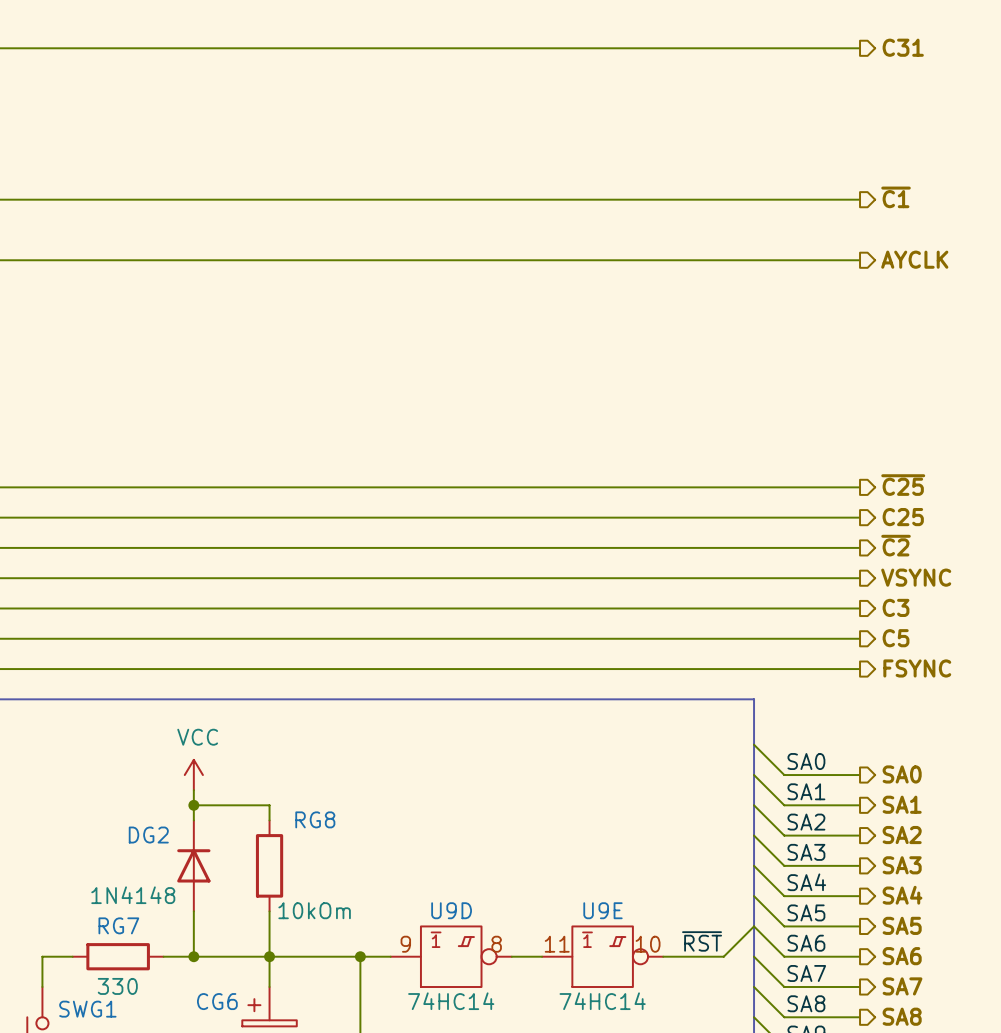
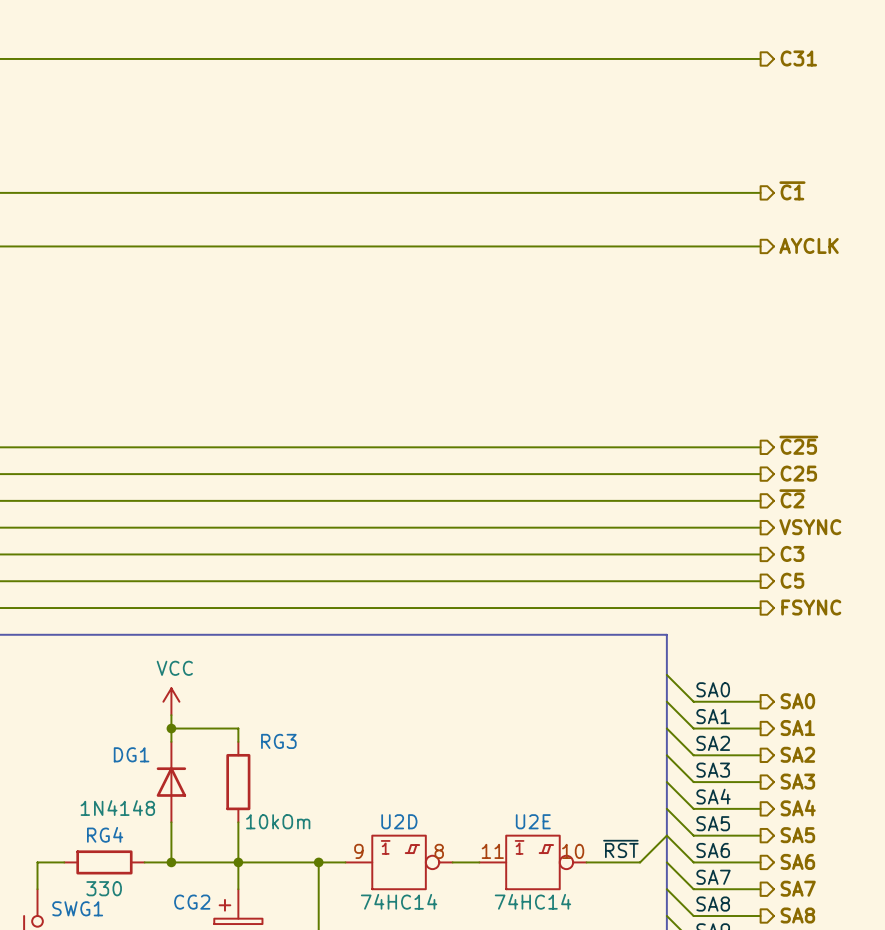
RG8 name: RG8 (315, 819) -> RG3 (278, 741)
DG2 name: DG2 (148, 835) -> DG1 (131, 754)
U9D name: U9D (451, 910) -> U2D (399, 821)
U9E name: U9E (602, 910) -> U2E (533, 821)
RG7 name: RG7 (118, 925) -> RG4 (105, 834)
CG6 name: CG6 (217, 1001) -> CG2 (192, 902)

